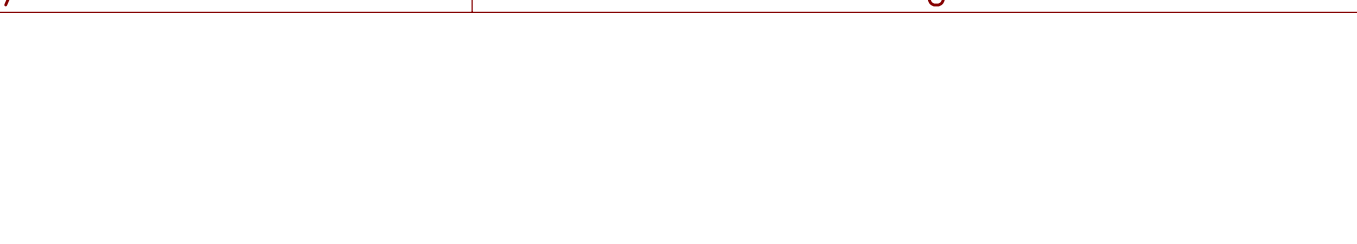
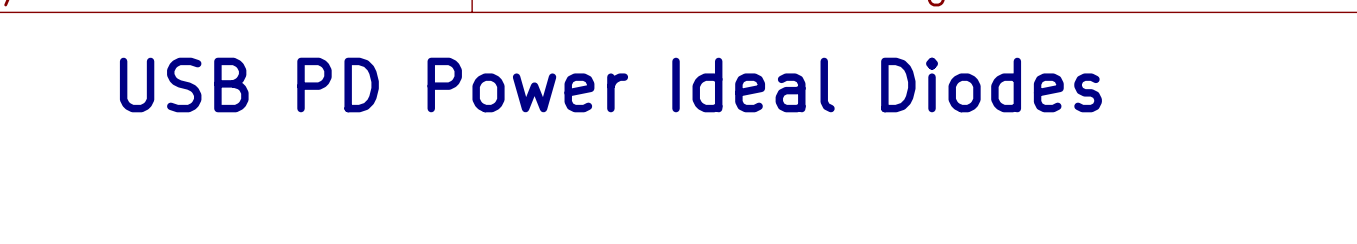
text: none -> USB PD Power Ideal Diodes (610, 85)

